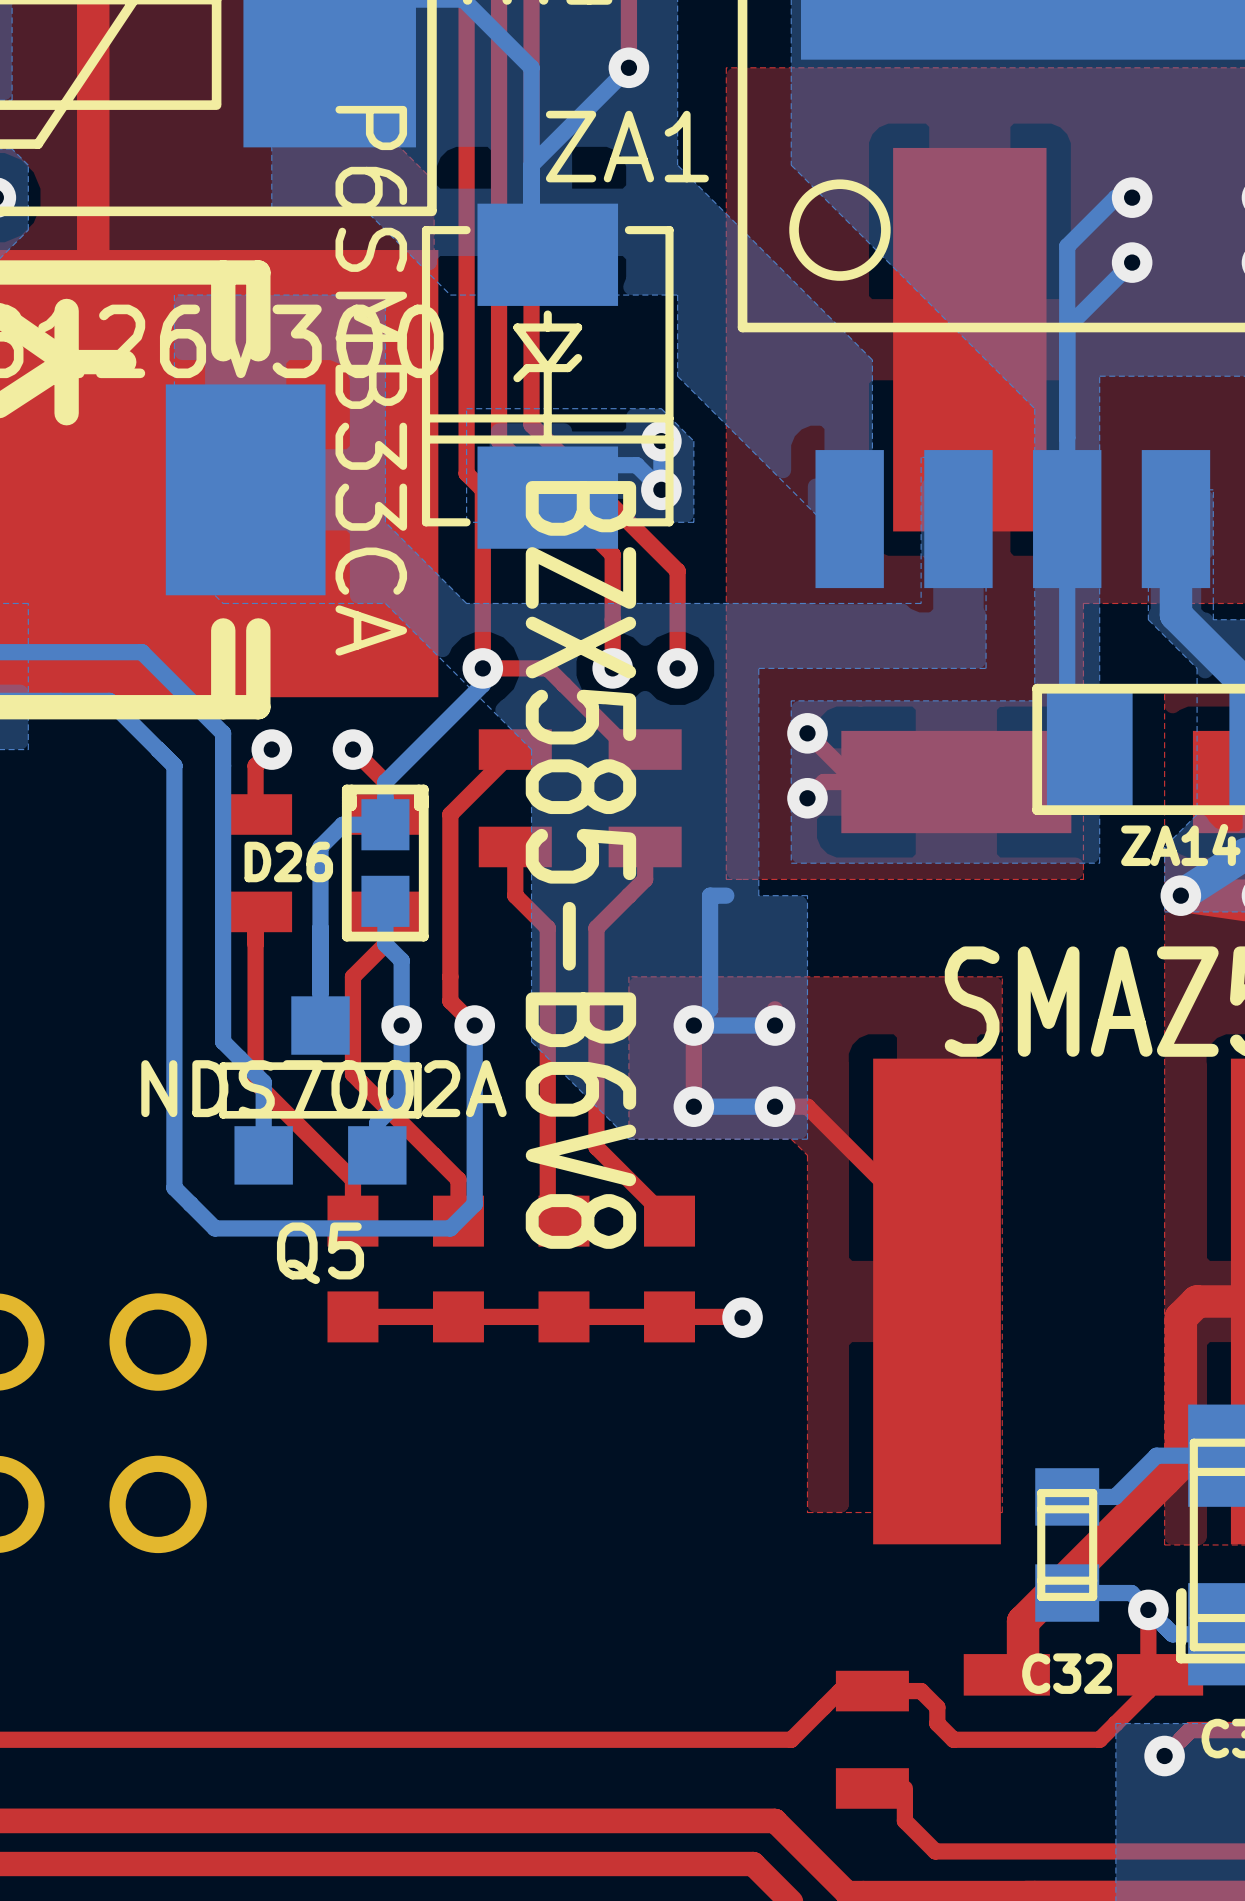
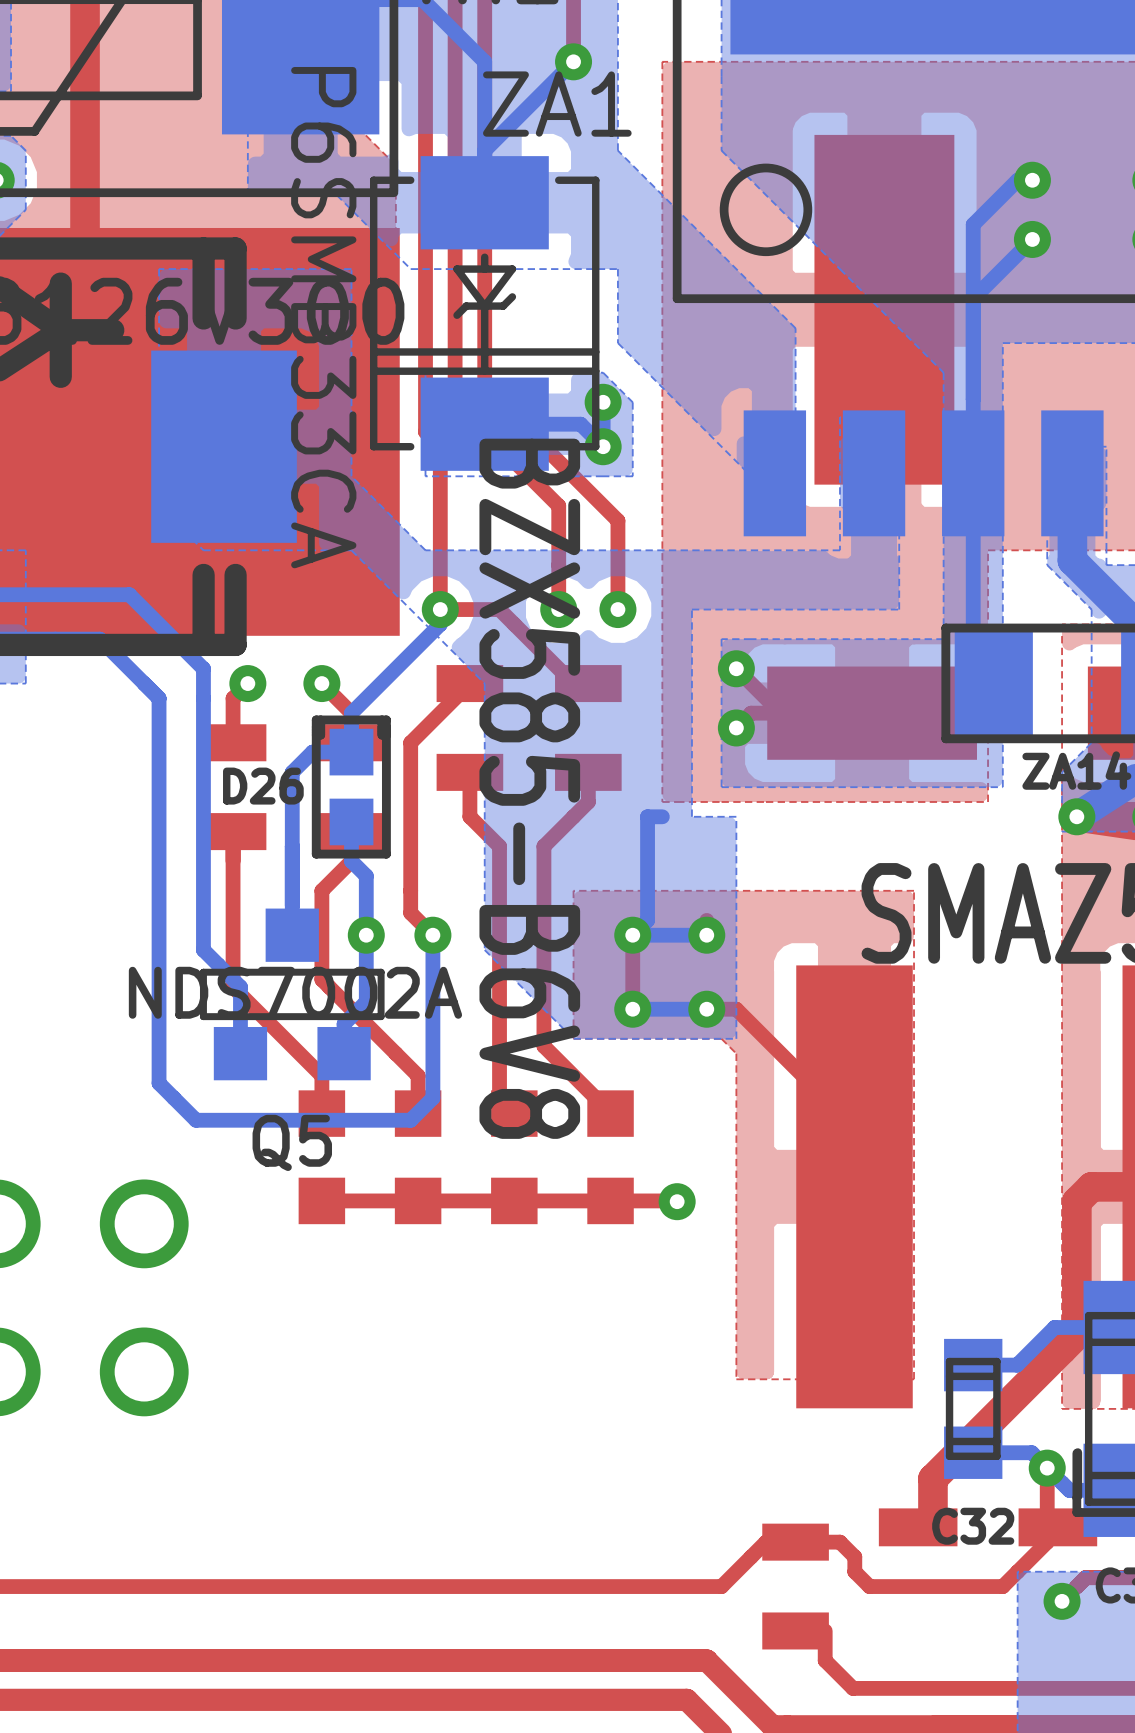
ZA1 position: (547, 376) -> (484, 313)

